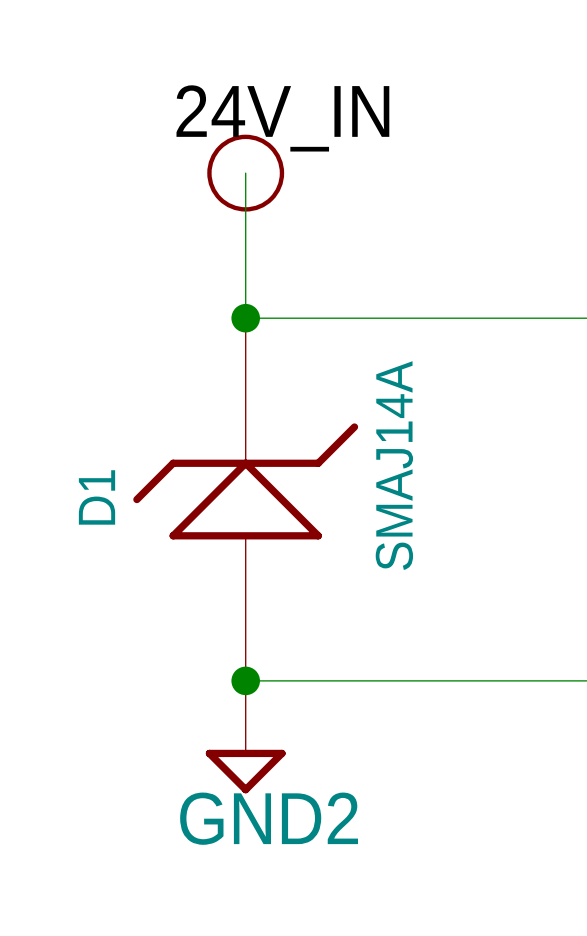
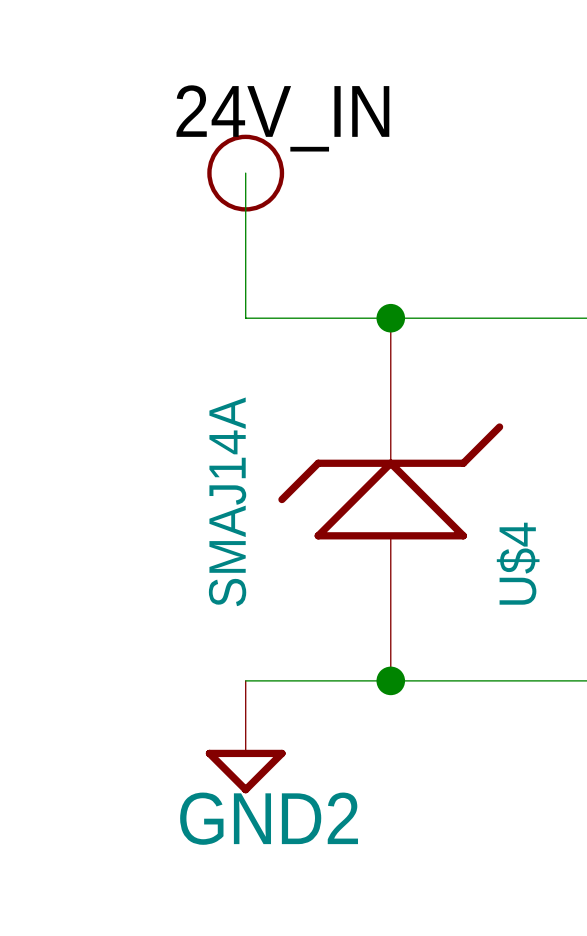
junction position: (245, 318) -> (390, 318)
D1: SMAJ14A (245, 499) -> none
U$4: none -> SMAJ14A (390, 499)
junction position: (245, 680) -> (390, 680)

